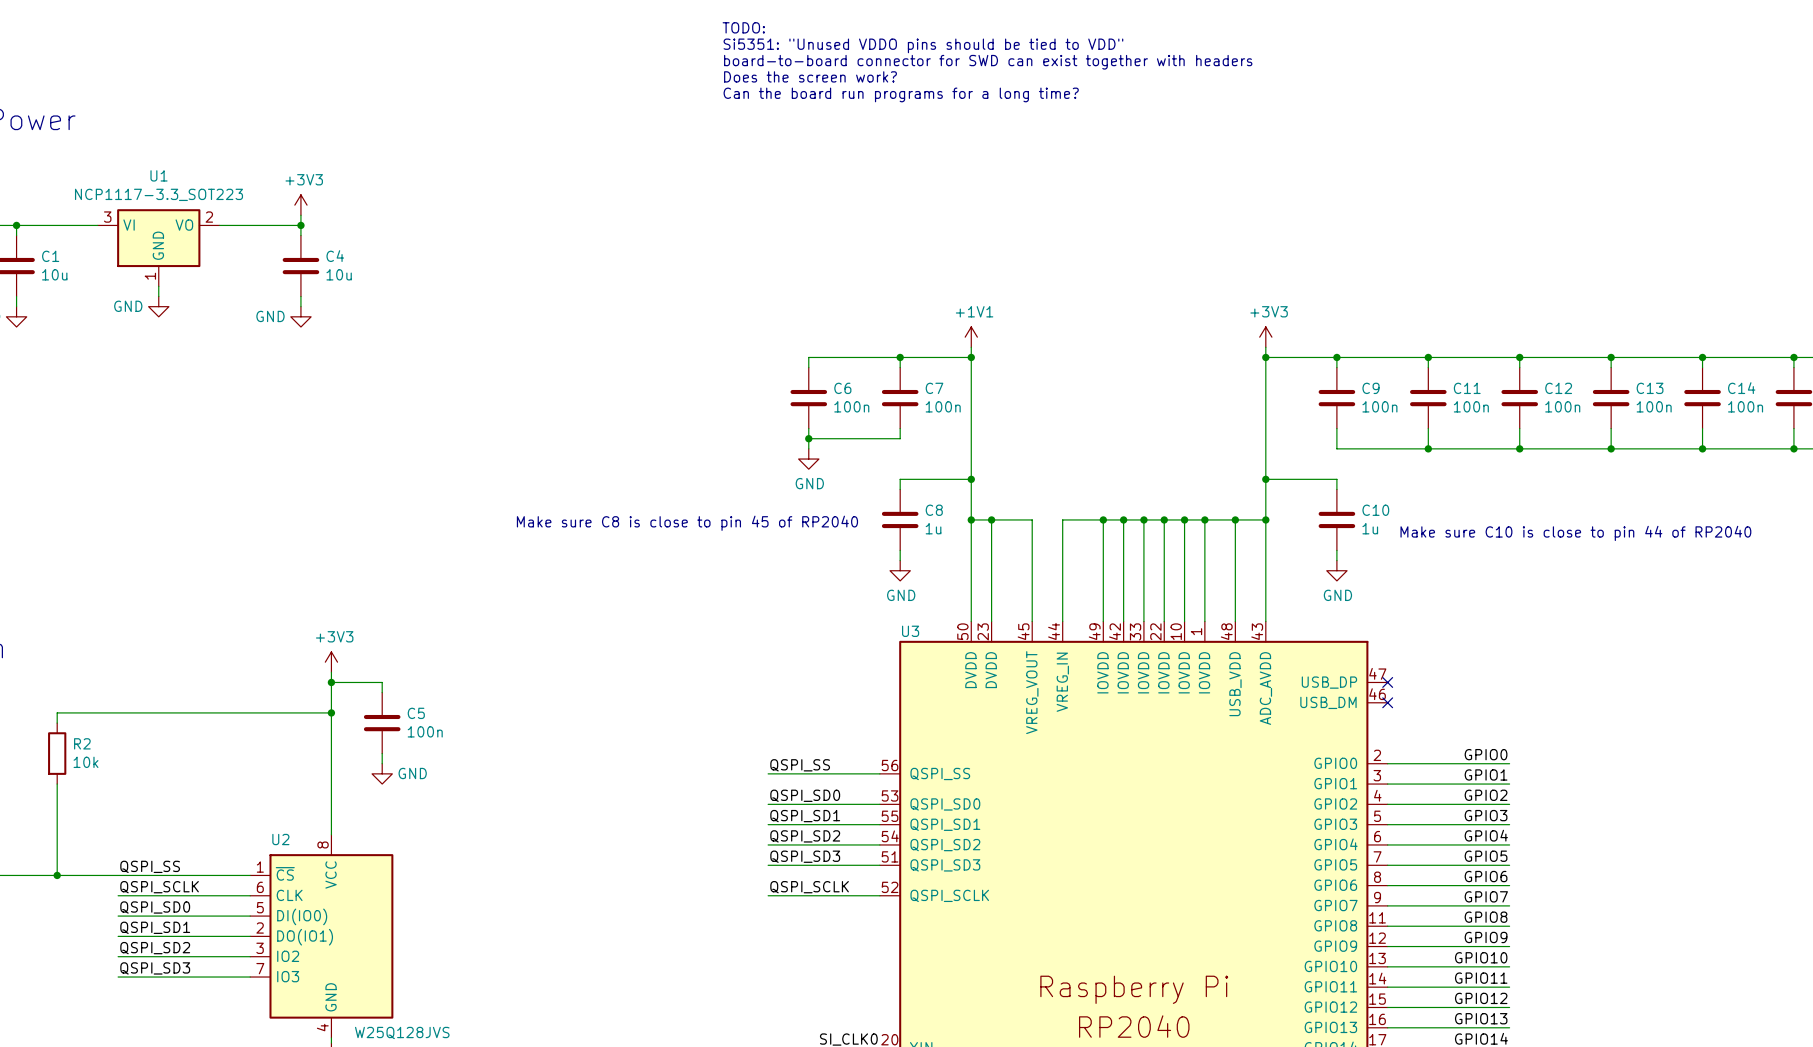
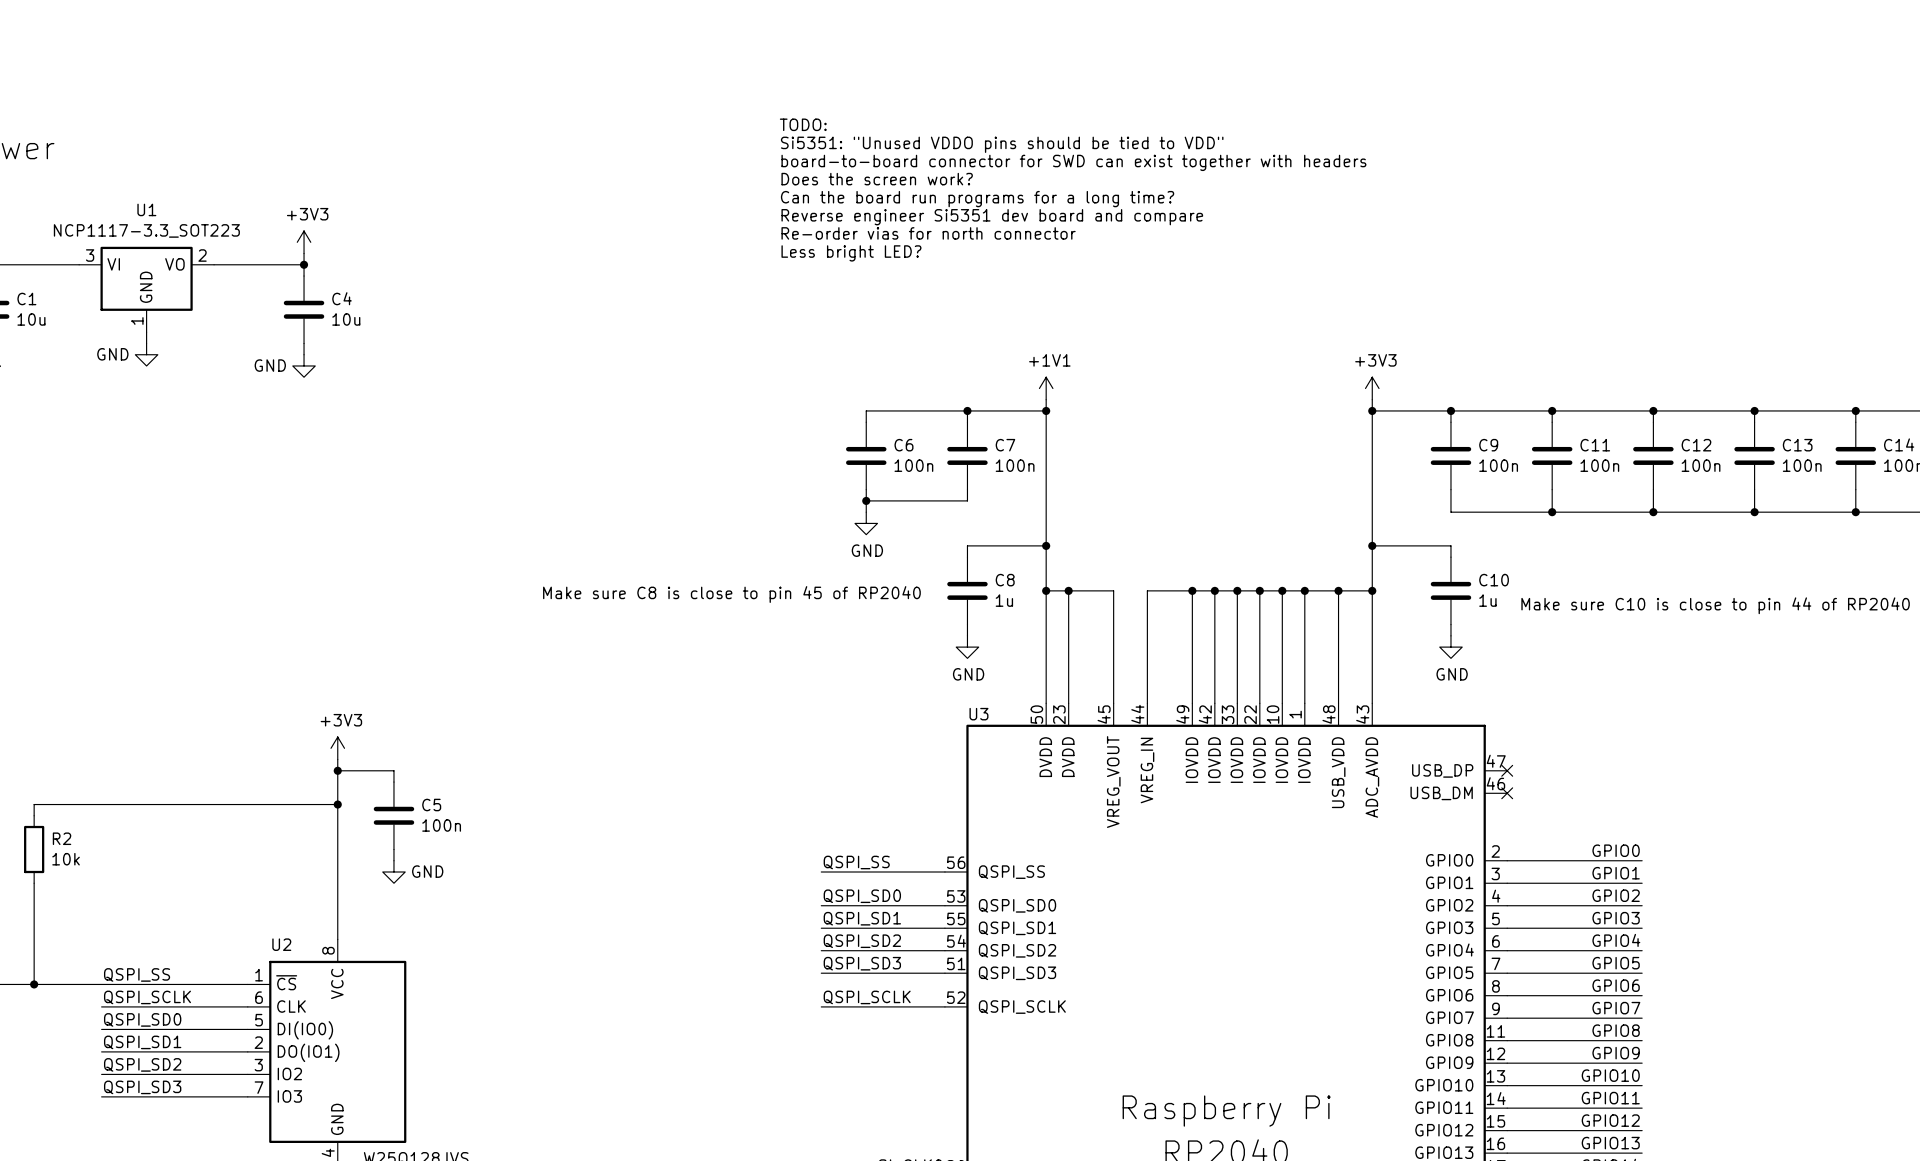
text position: TODO: (743, 27) -> TODO: (803, 124)
text position: Si5351: "Unused VDDO pins should be tied to VDD" (923, 45) -> Si5351: "Unused VDDO pins should be tied to VDD" (1002, 144)
text position: board-to-board connector for SWD can exist together with headers (988, 62) -> board-to-board connector for SWD can exist together with headers (1073, 162)
text position: Does the screen work? (810, 76) -> Does the screen work? (877, 179)
text position: Can the board run programs for a long time? (901, 94) -> Can the board run programs for a long time? (977, 199)
text: none -> Reverse engineer Si5351 dev board and compare (992, 217)
text: none -> Re-order vias for north connector (928, 233)
text: none -> Less bright LED? (851, 253)

